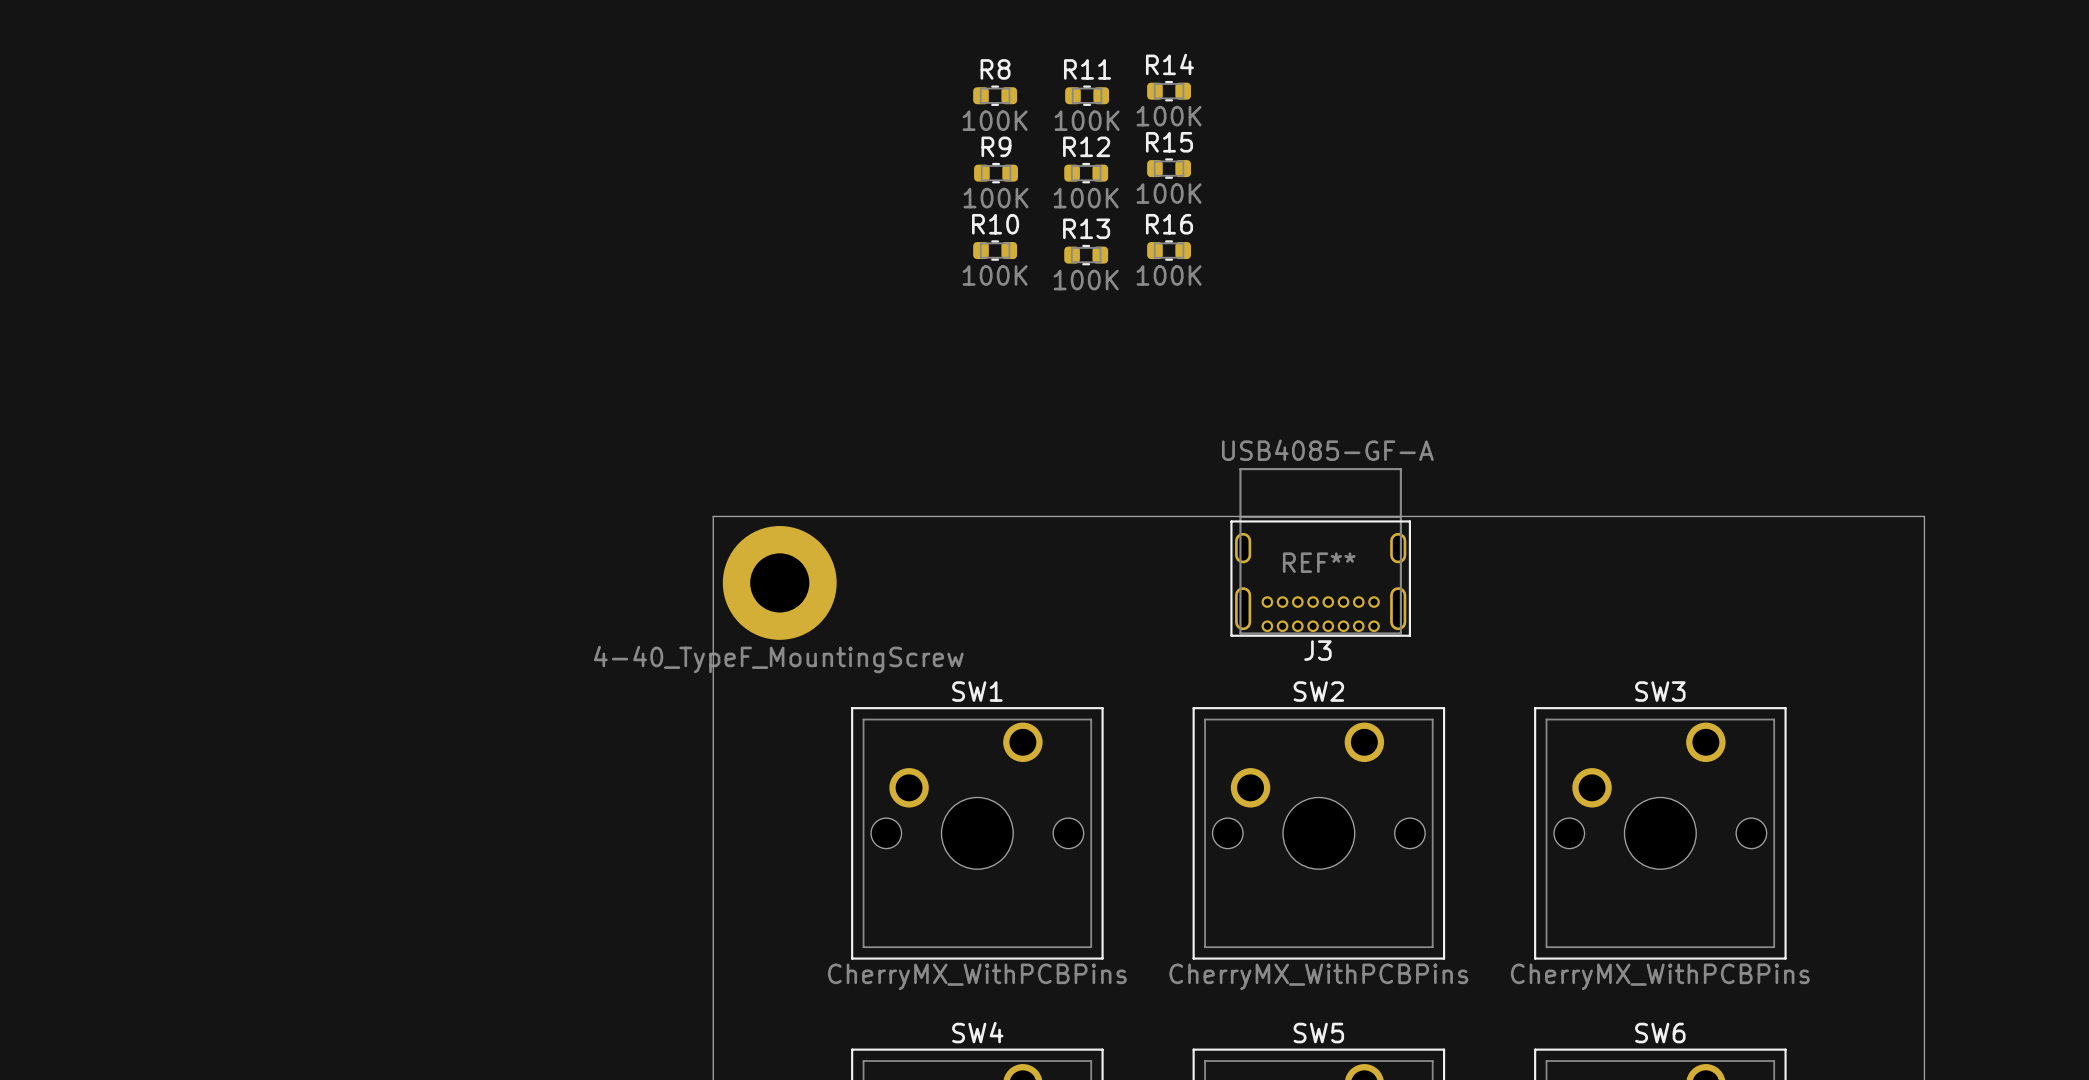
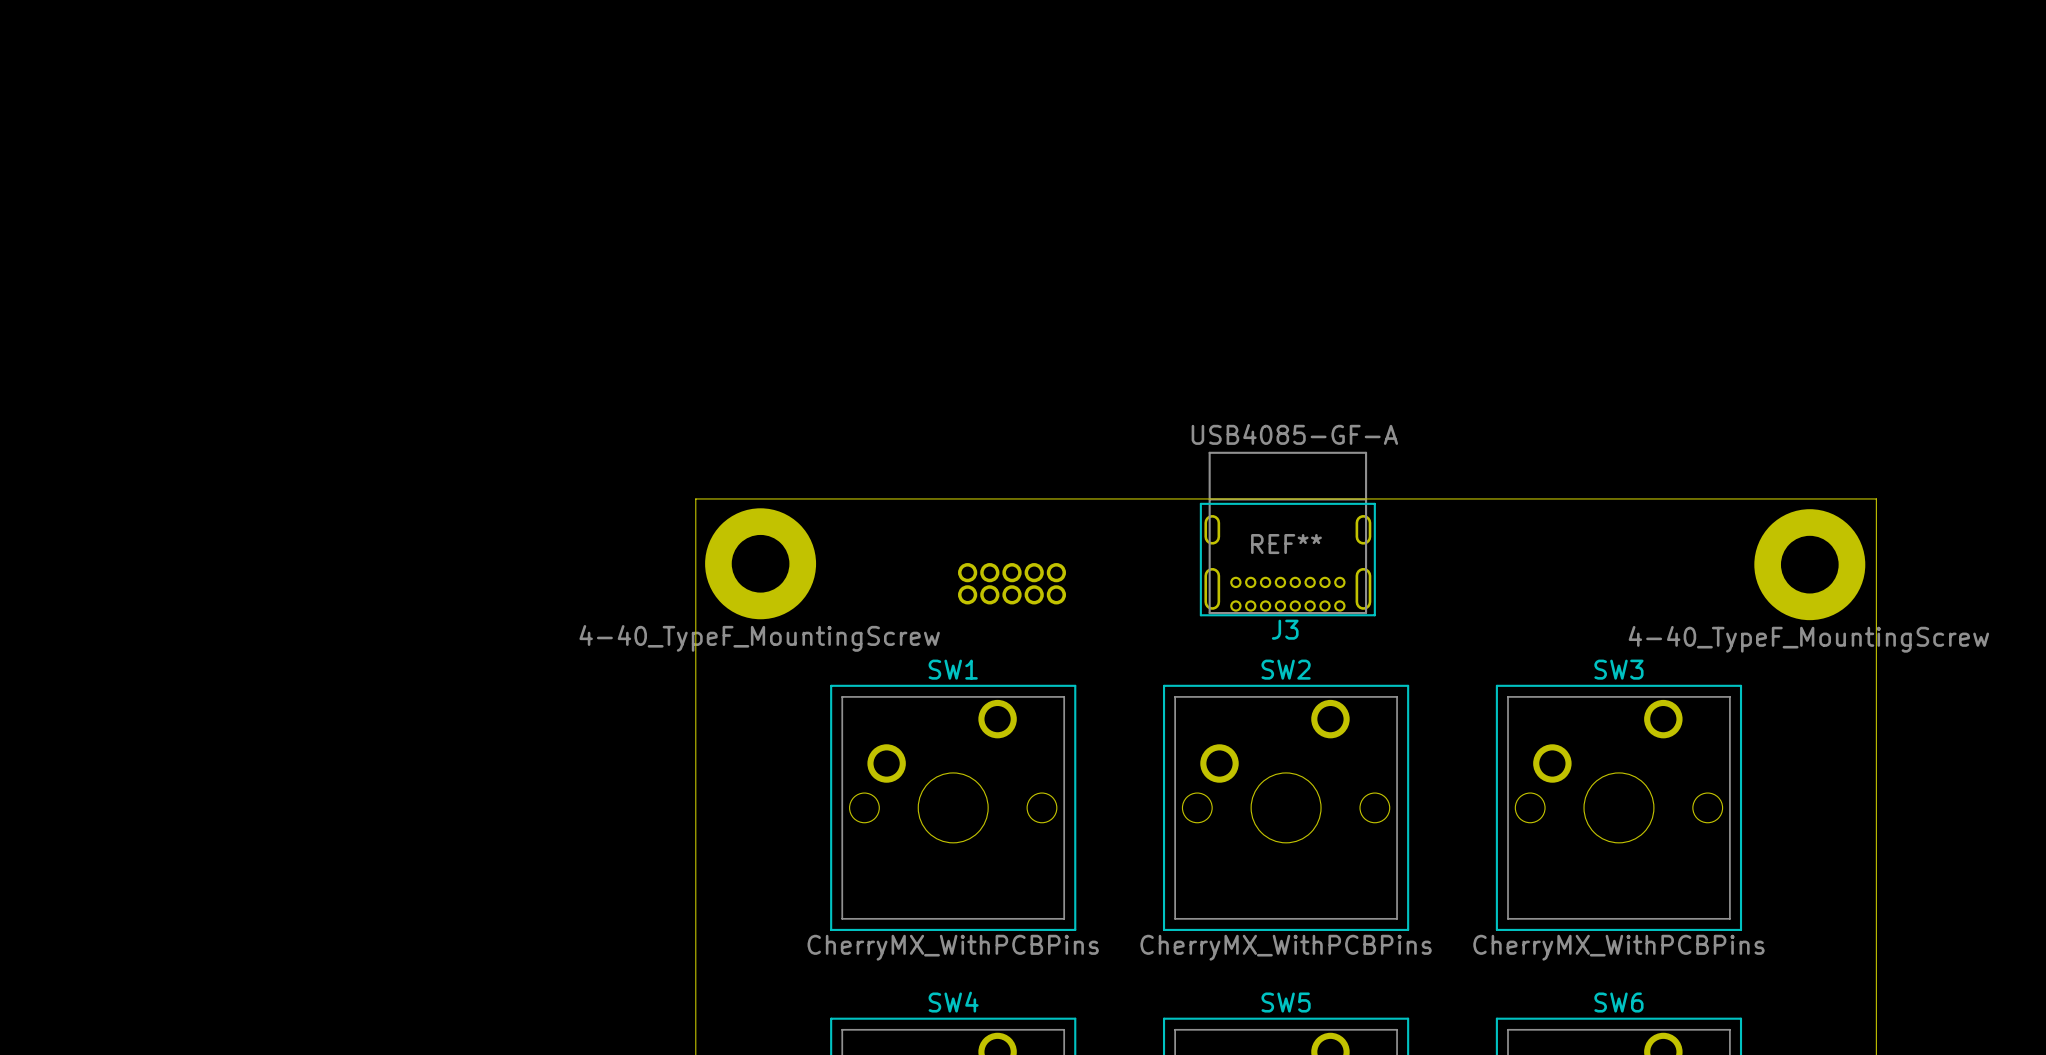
R14: 100K (1169, 91) -> none
R8: 100K (995, 95) -> none
R11: 100K (1087, 95) -> none
R15: 100K (1169, 168) -> none
R9: 100K (996, 173) -> none
R12: 100K (1086, 173) -> none
R10: 100K (995, 250) -> none
R16: 100K (1169, 250) -> none
R13: 100K (1086, 255) -> none
part: none -> 4-40_TypeF_MountingScrew (1809, 564)
part: none -> (1012, 583)

